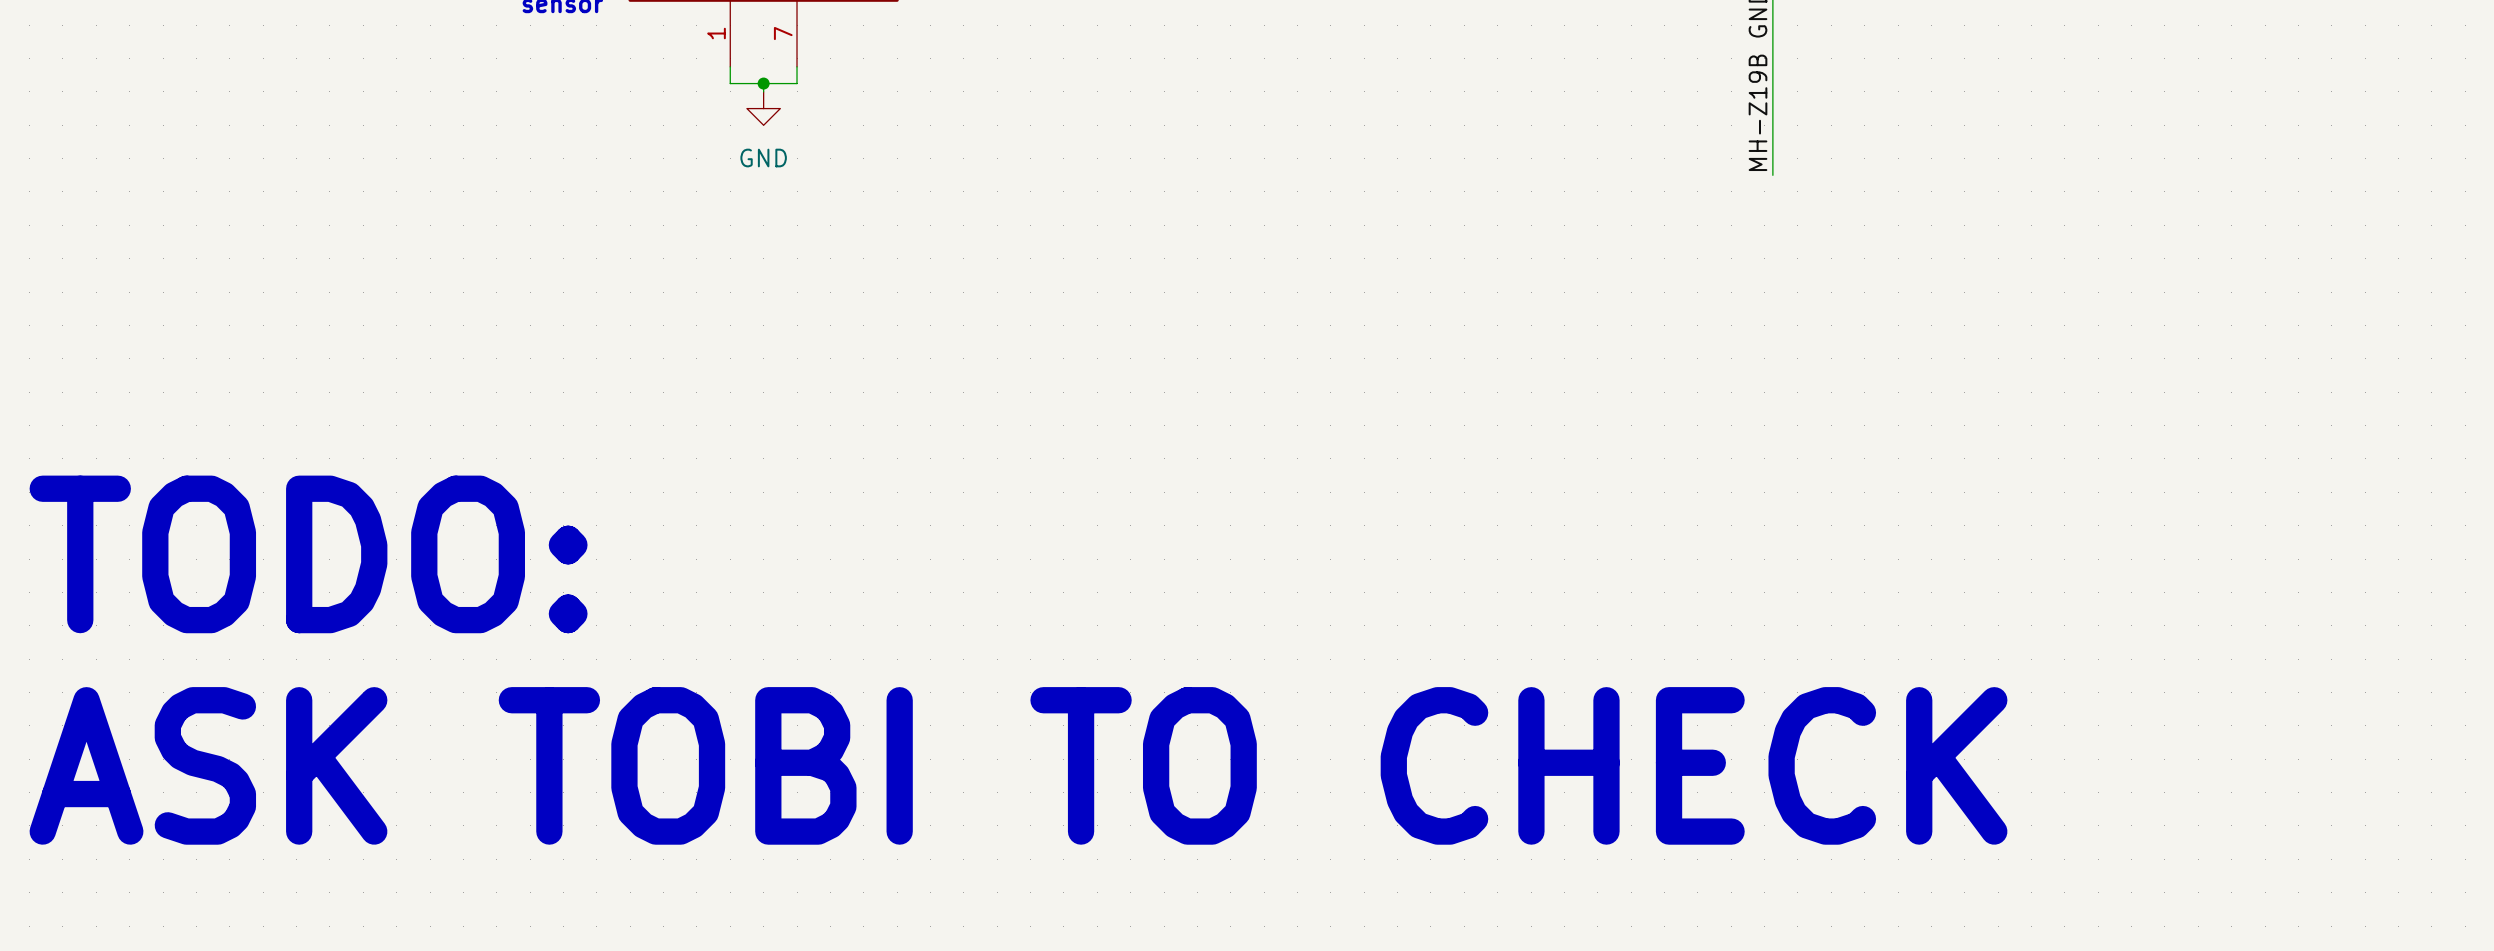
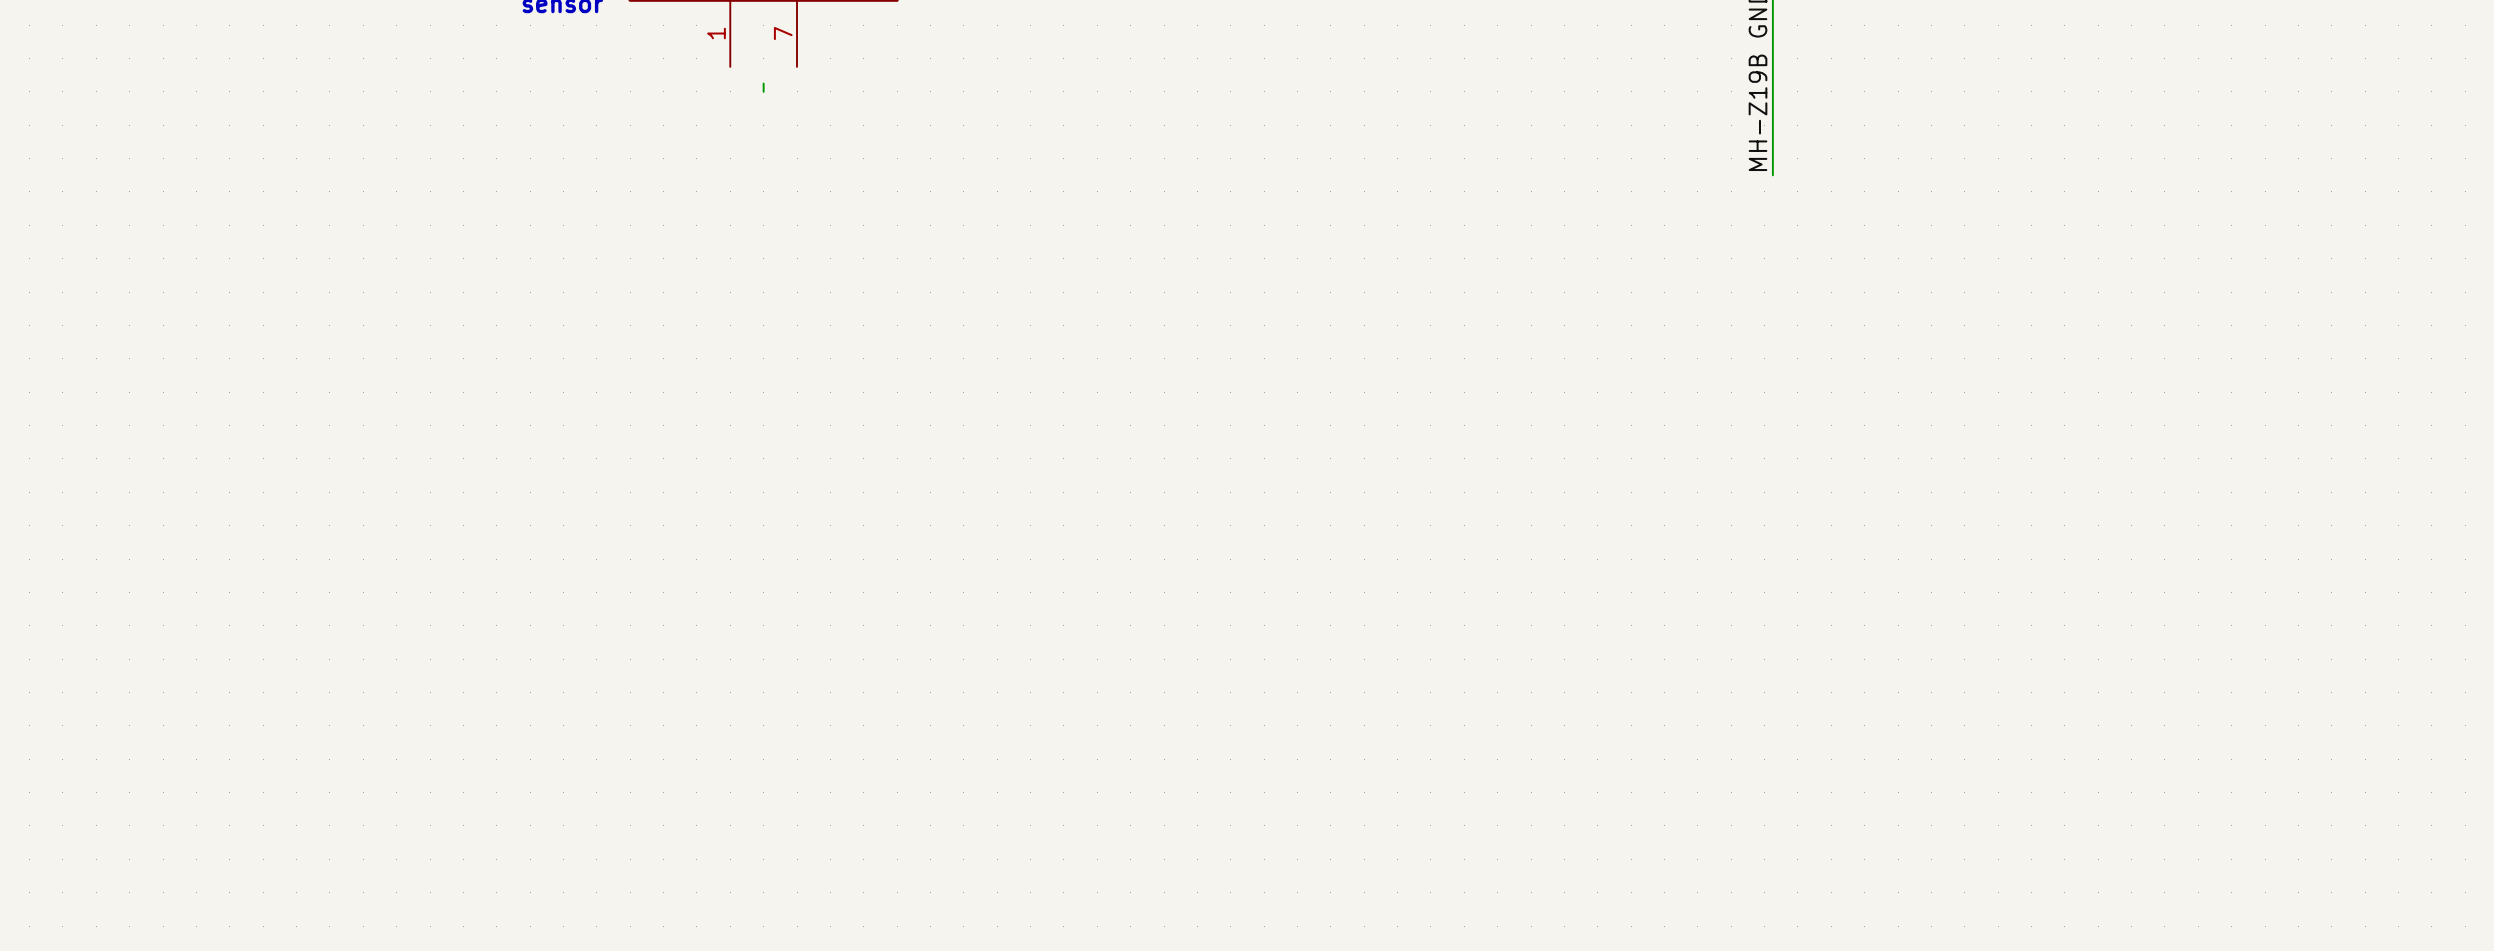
wire: (730, 66) (730, 83) (797, 83) (797, 66) -> none
junction: (763, 83) -> none
power symbol: GND (763, 108) -> none
text: TODO: (308, 554) -> none
text: ASK TOBI TO CHECK (1018, 765) -> none

